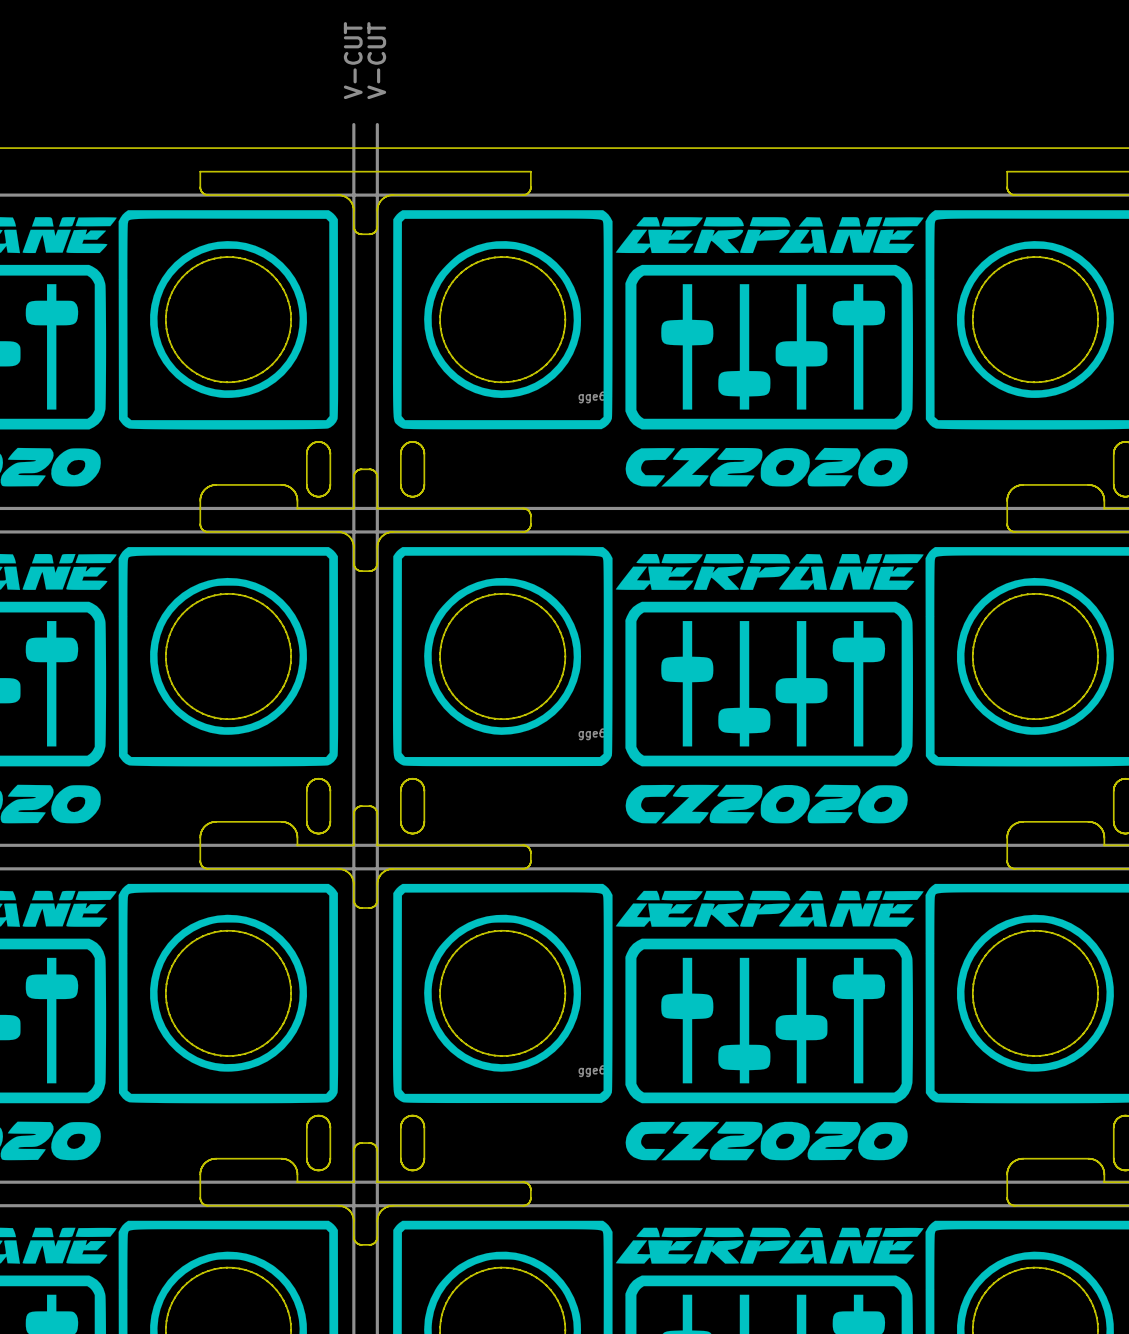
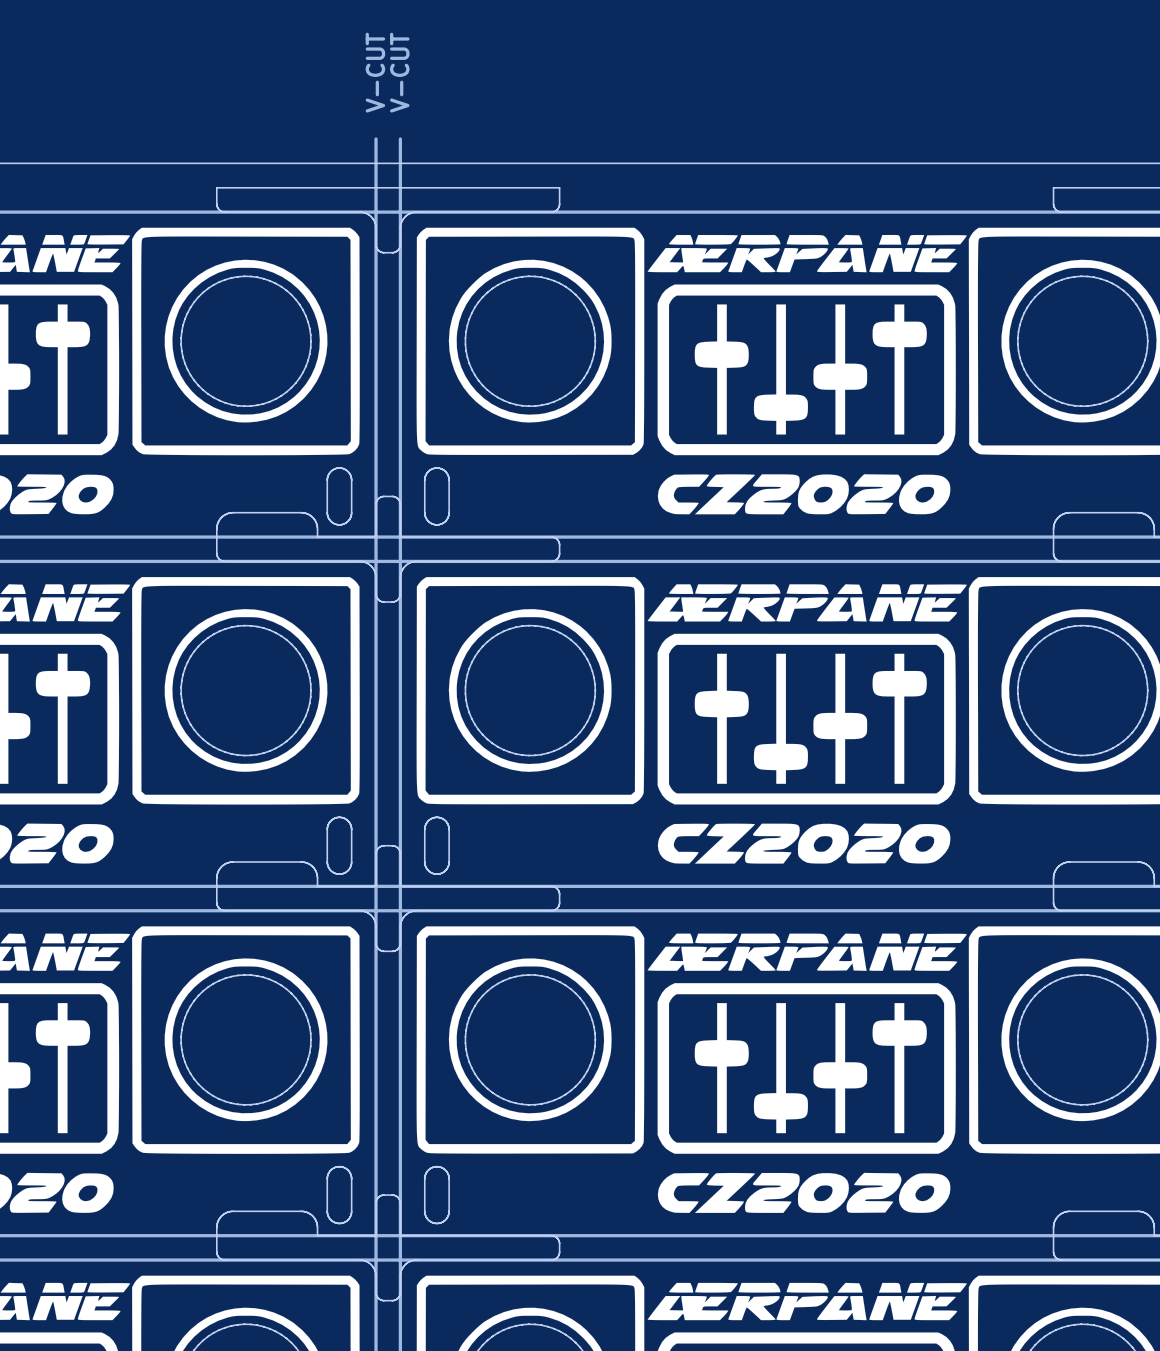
part: (592, 397) -> none
part: (592, 734) -> none
part: (592, 1071) -> none

